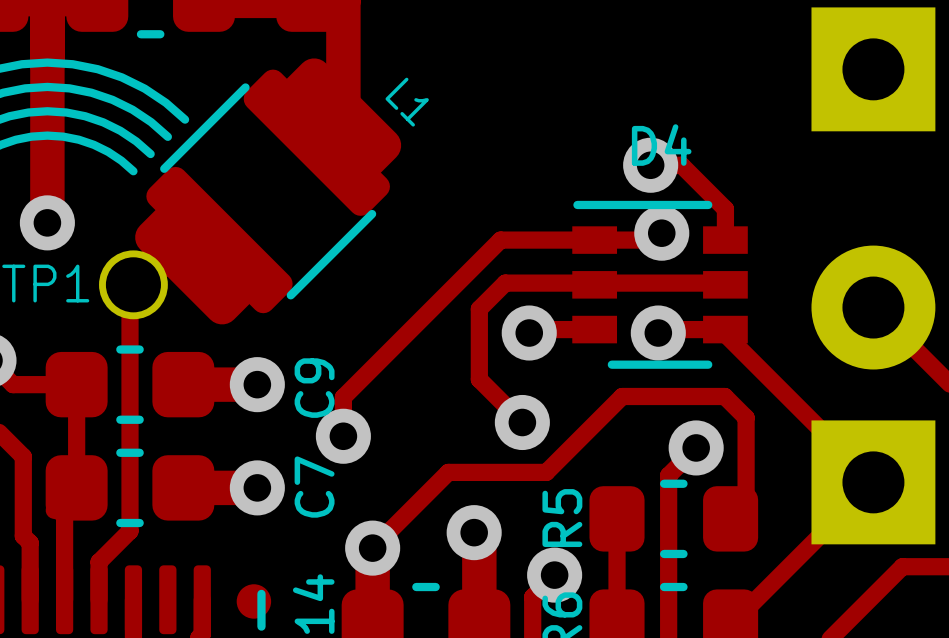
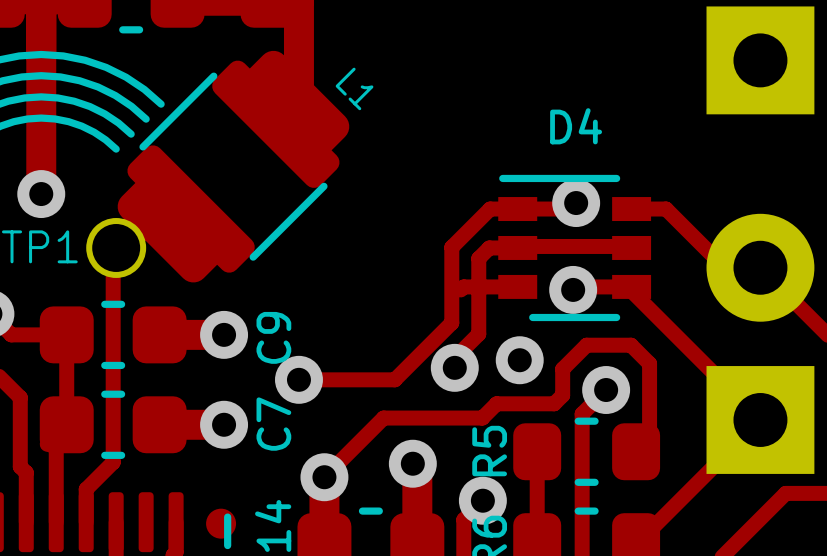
track: (650, 165) (681, 165) (725, 209) (725, 240) -> (760, 267) (724, 267) (666, 209) (631, 209)
via: (650, 165) -> none
track: (562, 240) (500, 240) (343, 397) (343, 436) -> (490, 209) (451, 247) (451, 322) (394, 379) (298, 379)
track: (594, 284) (592, 283) (505, 283) (479, 309) (479, 379) (522, 422) -> (517, 247) (489, 247) (478, 258) (478, 334) (461, 351) (461, 374)
via position: (529, 333) -> (519, 360)
track: (673, 396) (622, 396) (546, 472) (448, 472) (440, 480) -> (586, 345) (562, 369) (562, 395) (554, 403) (496, 403) (482, 418) (383, 418)

